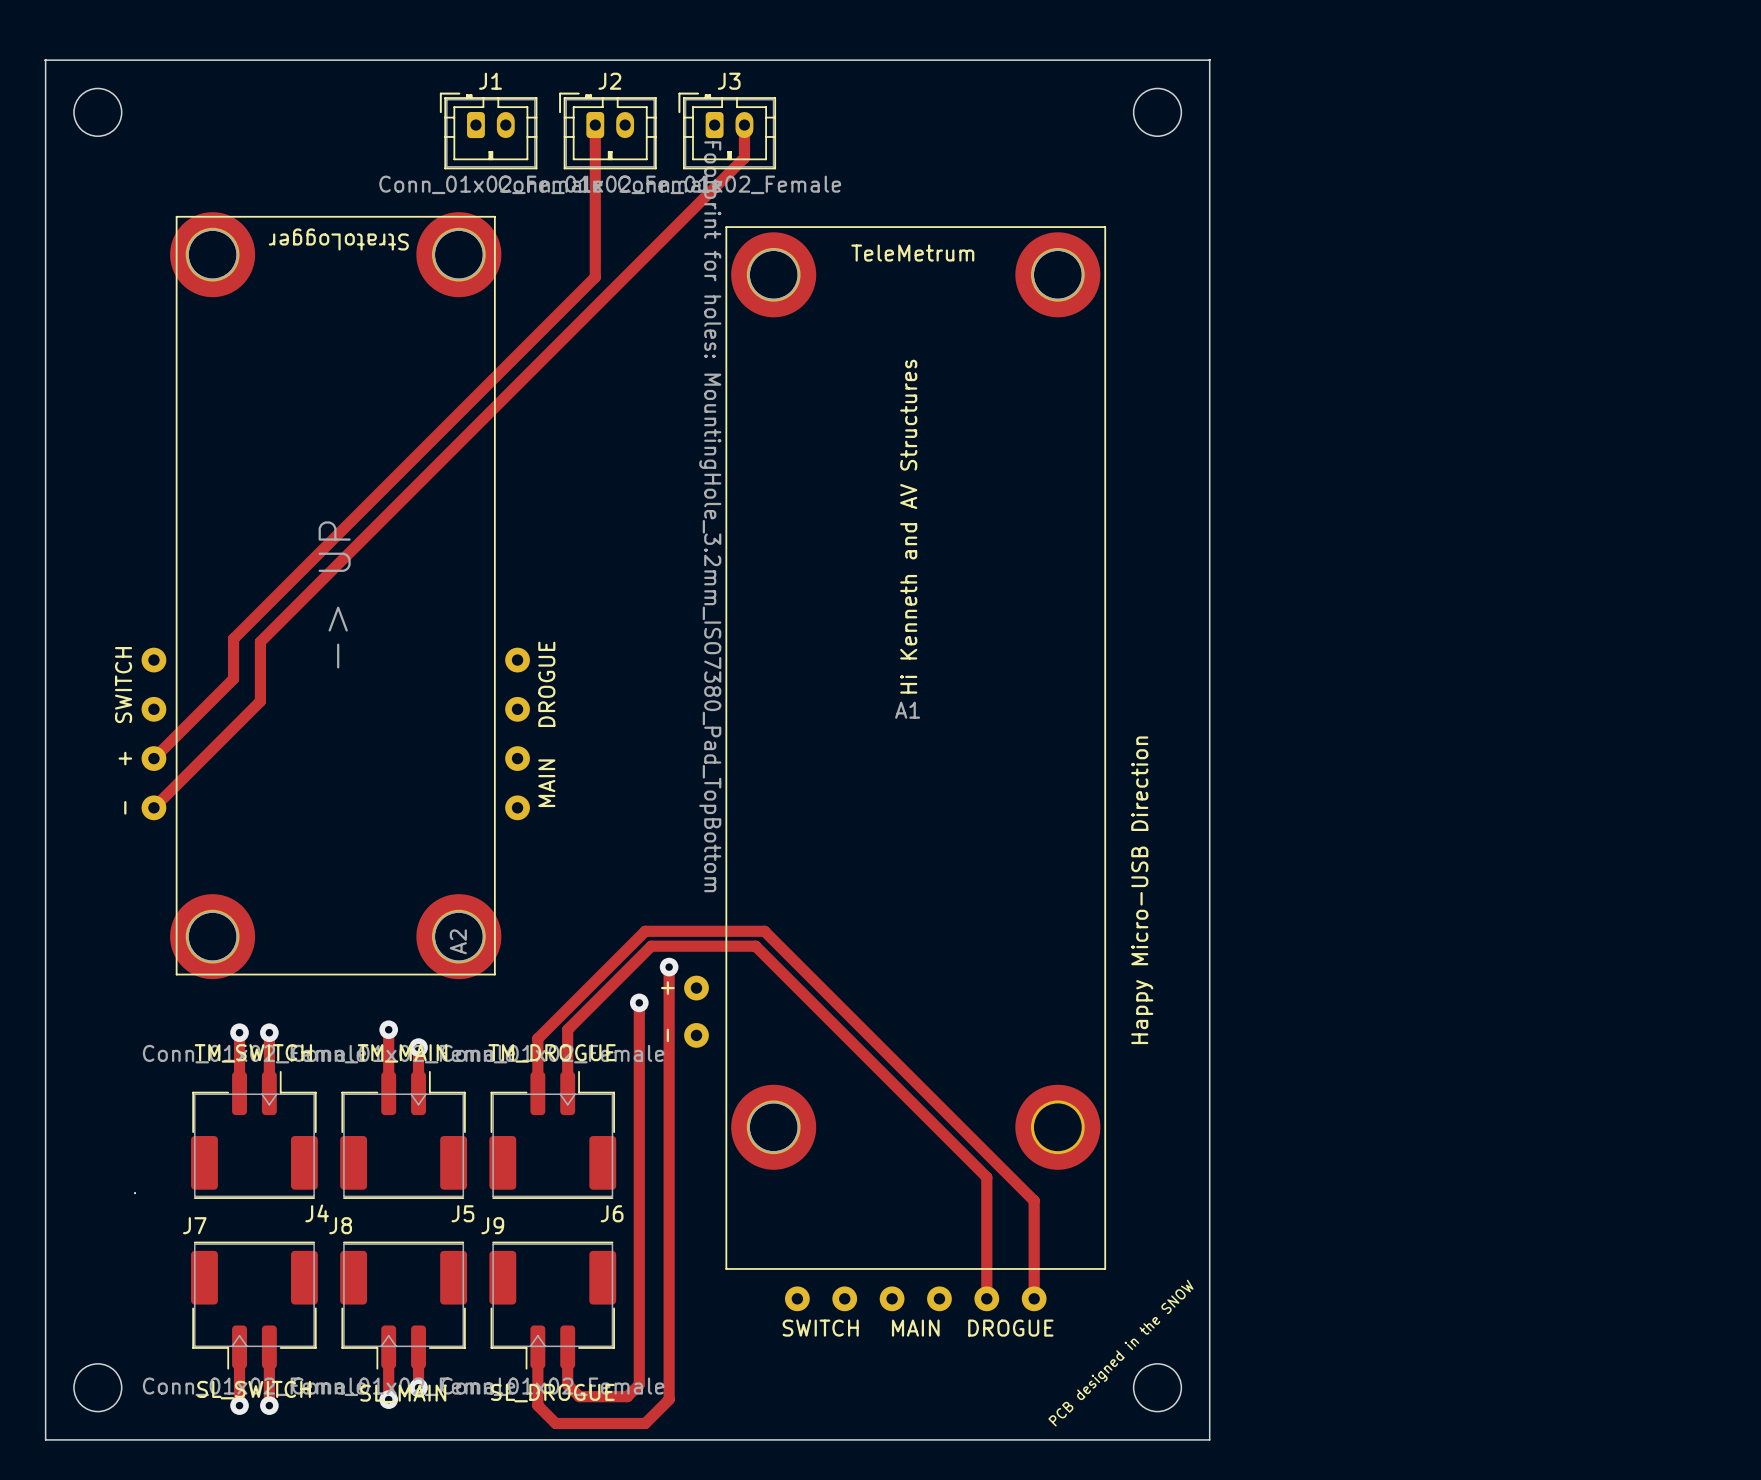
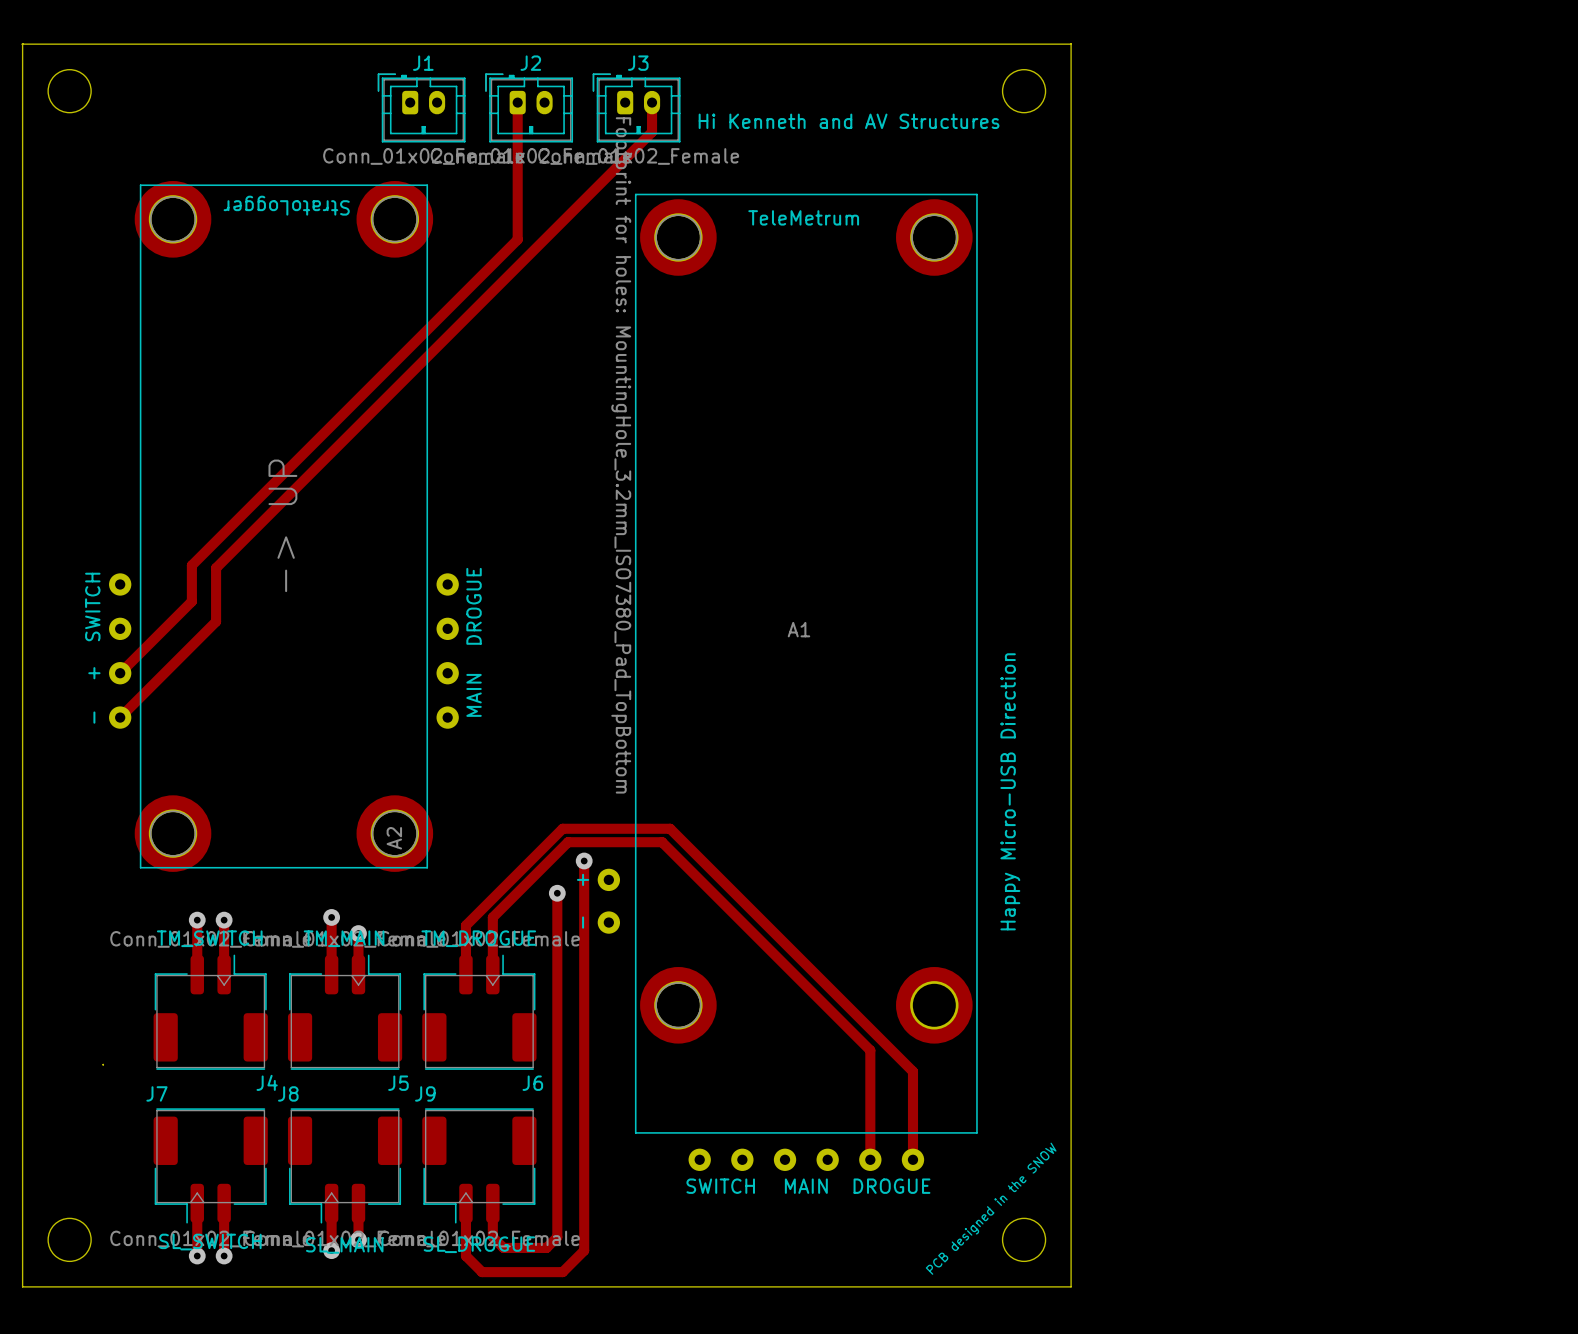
text: none -> Hi Kenneth and AV Structures (849, 121)
text: Hi Kenneth and AV Structures (908, 526) -> none

